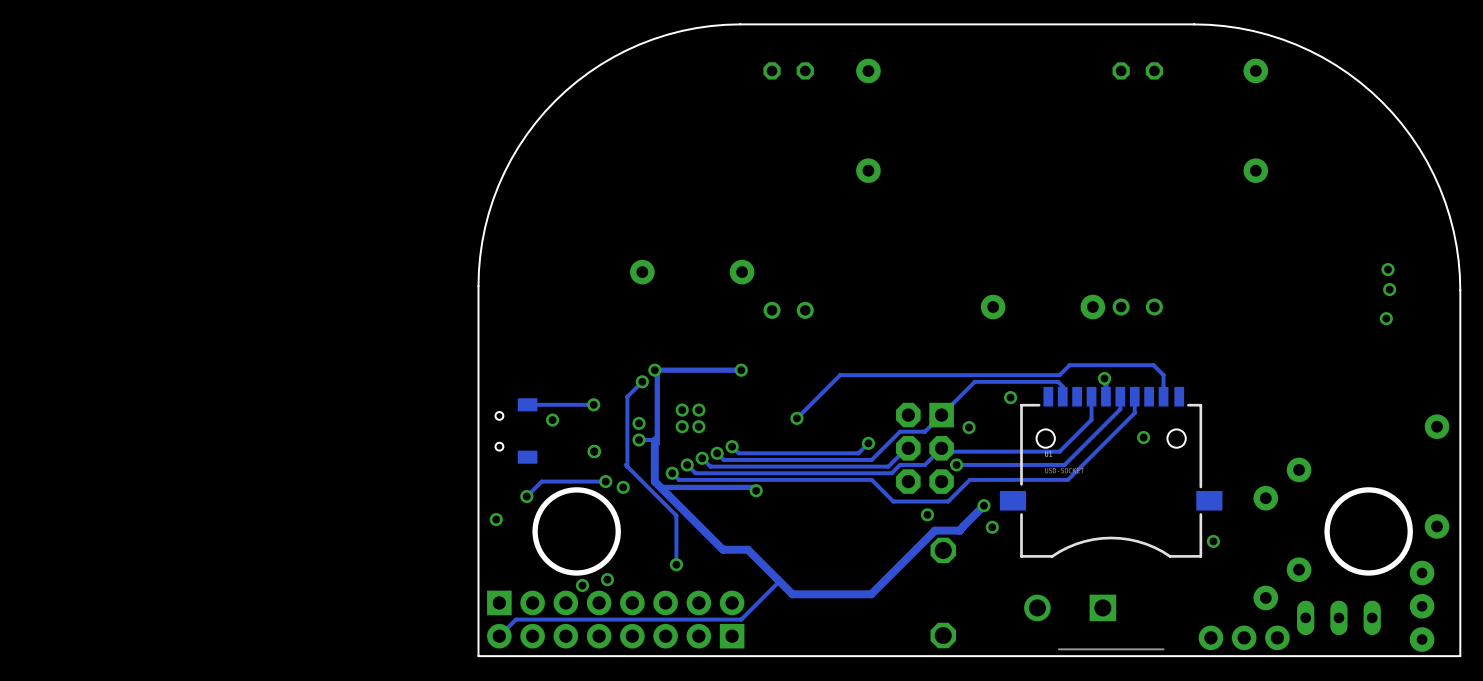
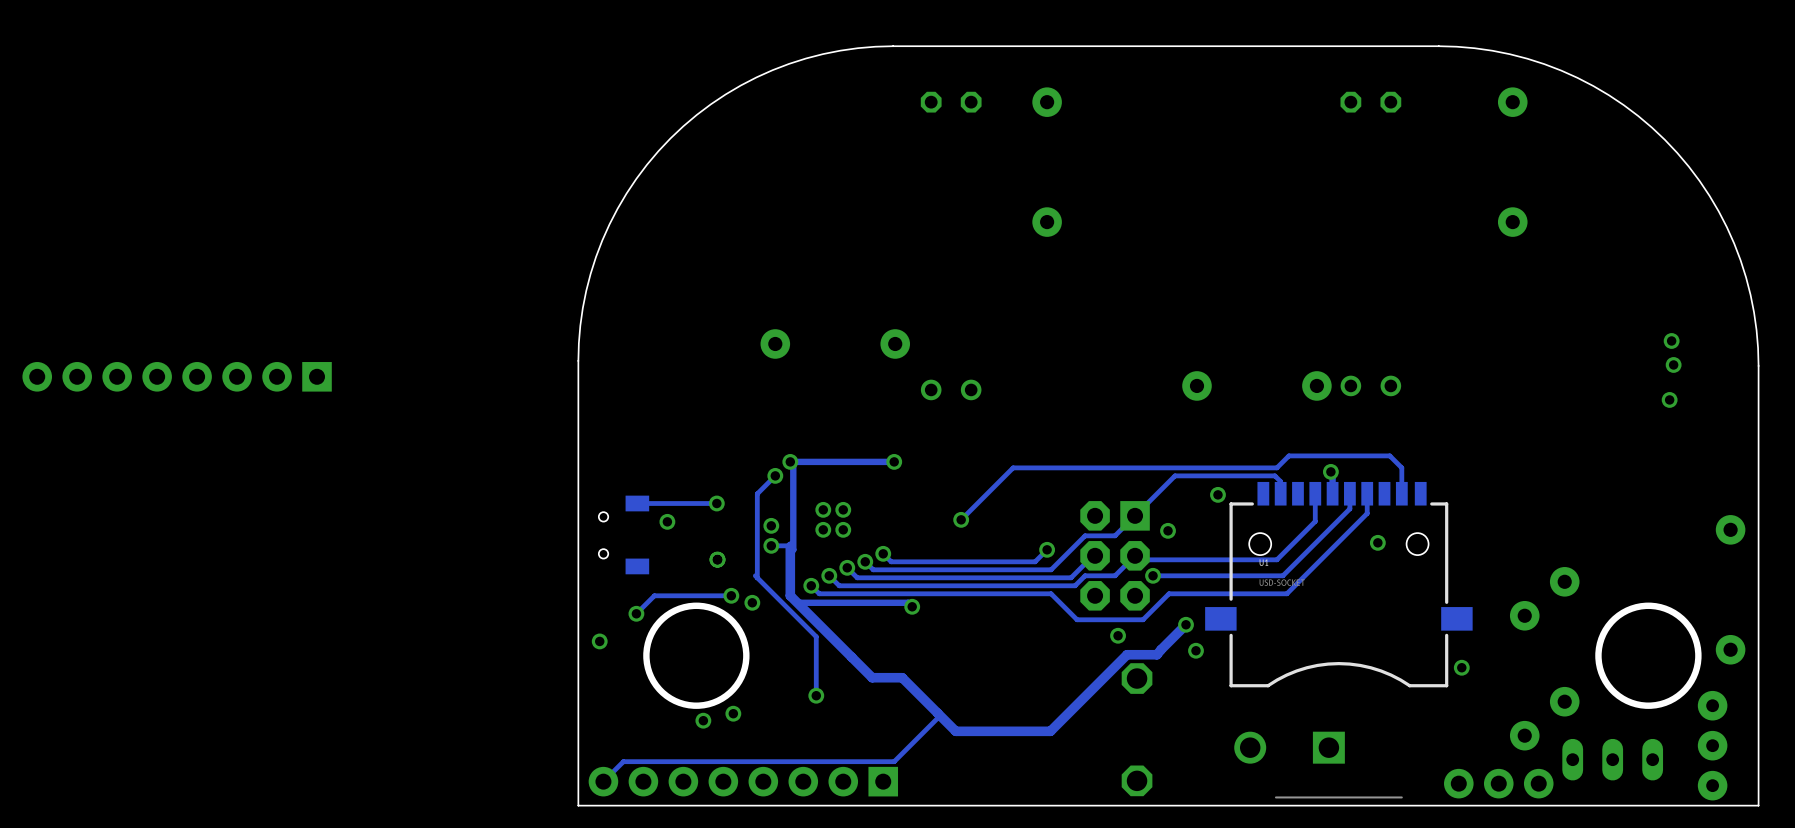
part: none -> (177, 376)
part: (615, 602) -> none

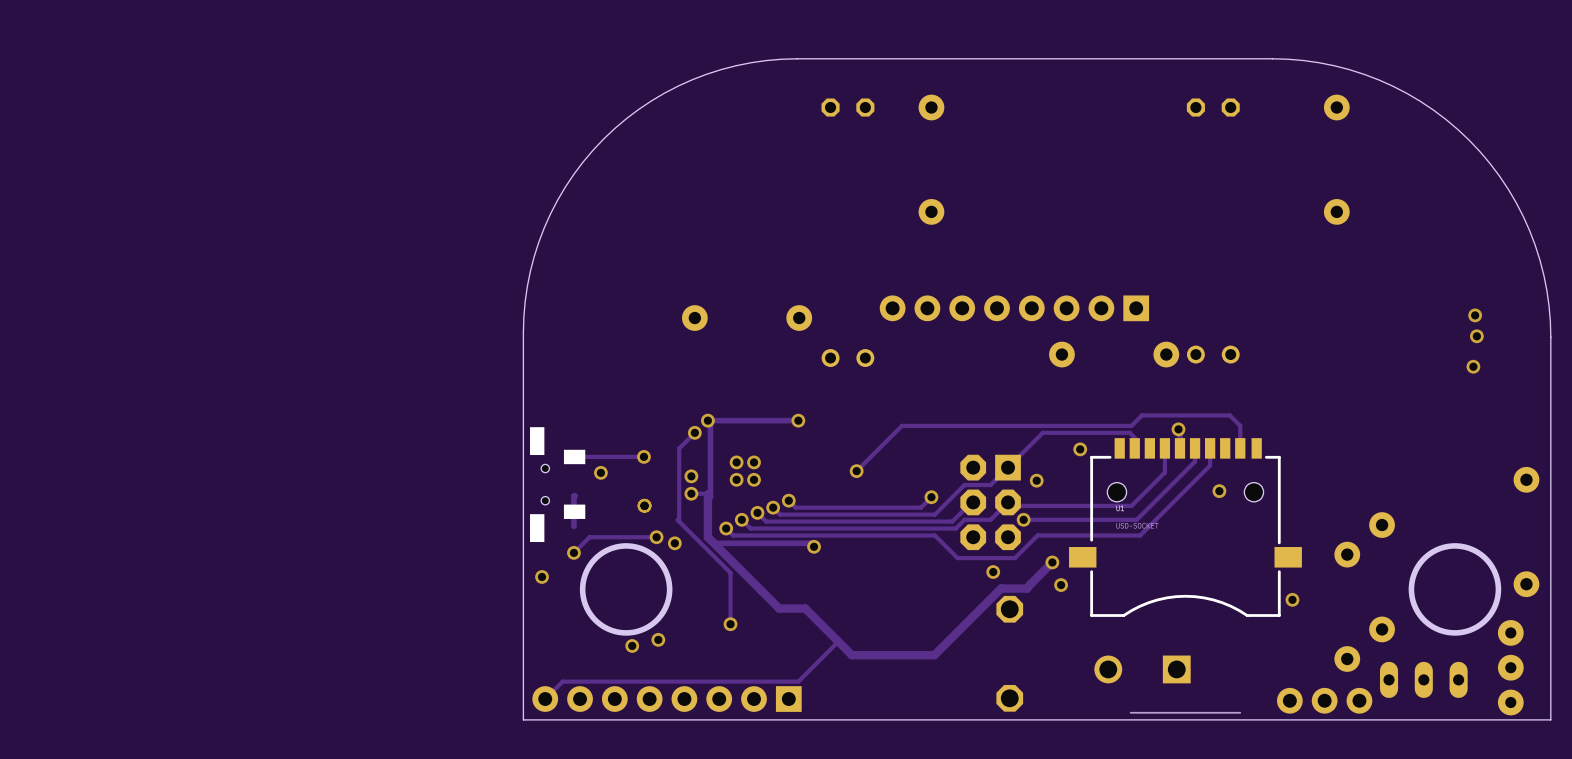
part: none -> (1014, 308)
part: (177, 376) -> none
drawing: none -> [530, 427, 545, 456]
drawing: none -> [563, 449, 586, 465]
track: none -> (575, 495) (573, 526)
drawing: none -> [563, 504, 586, 519]
drawing: none -> [530, 514, 545, 543]

